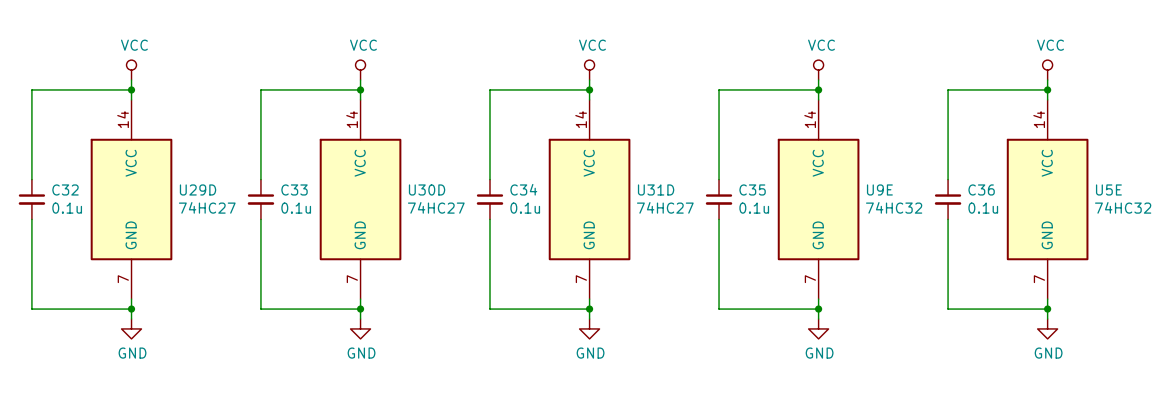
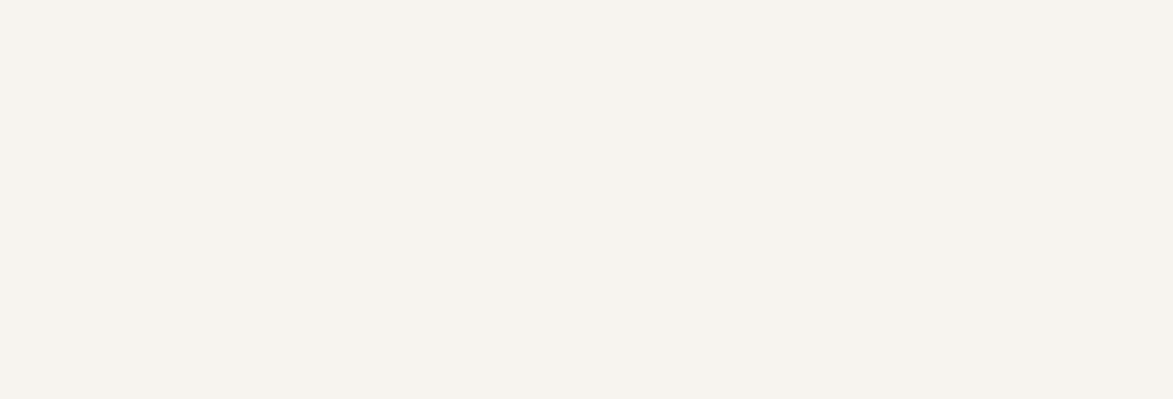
power symbol: VCC (131, 70) -> none
power symbol: VCC (360, 70) -> none
power symbol: VCC (589, 70) -> none
power symbol: VCC (818, 70) -> none
power symbol: VCC (1047, 70) -> none
wire: (131, 80) (131, 99) -> none
wire: (360, 80) (360, 99) -> none
wire: (589, 80) (589, 99) -> none
wire: (818, 80) (818, 99) -> none
wire: (1047, 80) (1047, 99) -> none
wire: (131, 89) (31, 89) (31, 179) -> none
junction: (131, 89) -> none
wire: (360, 89) (260, 89) (260, 179) -> none
junction: (360, 89) -> none
wire: (589, 89) (489, 89) (489, 179) -> none
junction: (589, 89) -> none
wire: (818, 89) (719, 89) (719, 179) -> none
junction: (818, 89) -> none
wire: (1047, 89) (948, 89) (948, 179) -> none
junction: (1047, 89) -> none
C32: 0.1u (31, 199) -> none
U29D: 74HC27 (131, 199) -> none
C33: 0.1u (260, 199) -> none
U30D: 74HC27 (360, 199) -> none
C34: 0.1u (489, 199) -> none
U31D: 74HC27 (589, 199) -> none
C35: 0.1u (719, 199) -> none
U9E: 74HC32 (818, 199) -> none
C36: 0.1u (948, 199) -> none
U5E: 74HC32 (1047, 199) -> none
wire: (31, 219) (31, 309) (131, 309) -> none
wire: (260, 219) (260, 309) (360, 309) -> none
wire: (489, 219) (489, 309) (589, 309) -> none
wire: (719, 219) (719, 309) (818, 309) -> none
wire: (948, 219) (948, 309) (1047, 309) -> none
wire: (131, 299) (131, 319) -> none
wire: (360, 299) (360, 319) -> none
wire: (589, 299) (589, 319) -> none
wire: (818, 299) (818, 319) -> none
wire: (1047, 299) (1047, 319) -> none
junction: (131, 309) -> none
junction: (360, 309) -> none
junction: (589, 309) -> none
junction: (818, 309) -> none
junction: (1047, 309) -> none
power symbol: GND (131, 328) -> none
power symbol: GND (360, 328) -> none
power symbol: GND (589, 328) -> none
power symbol: GND (818, 328) -> none
power symbol: GND (1047, 328) -> none

